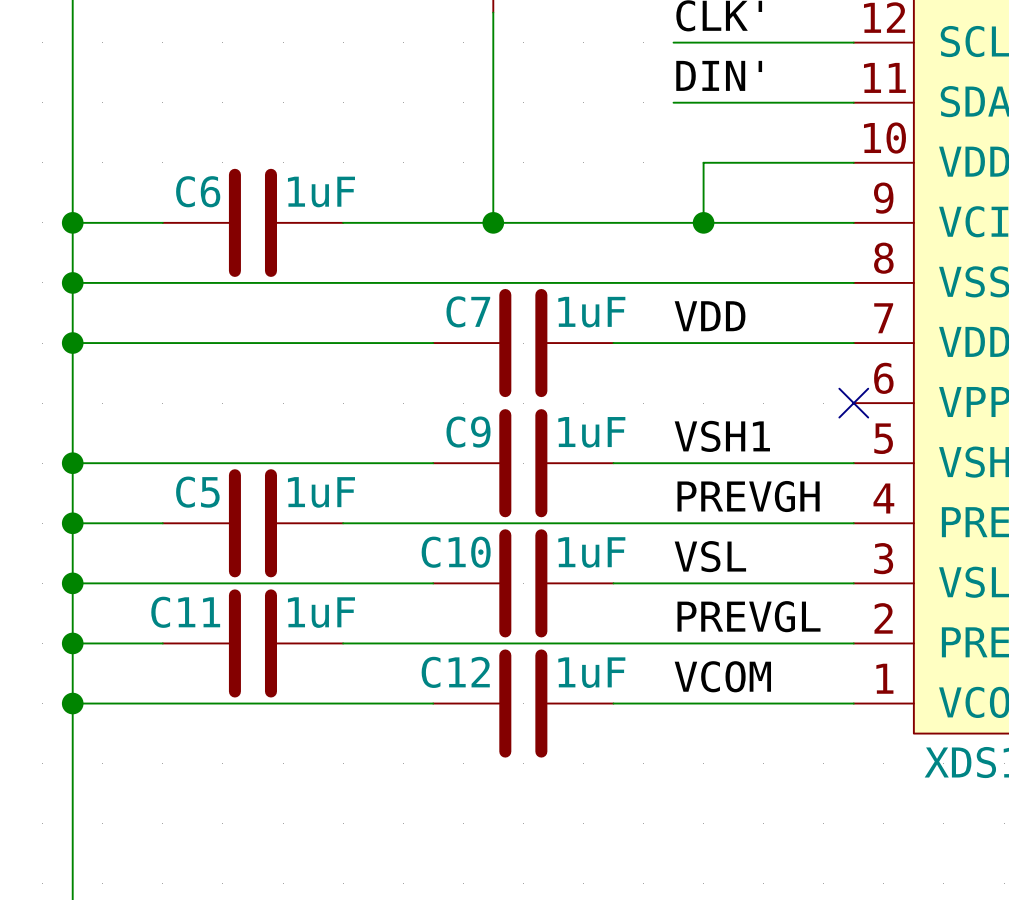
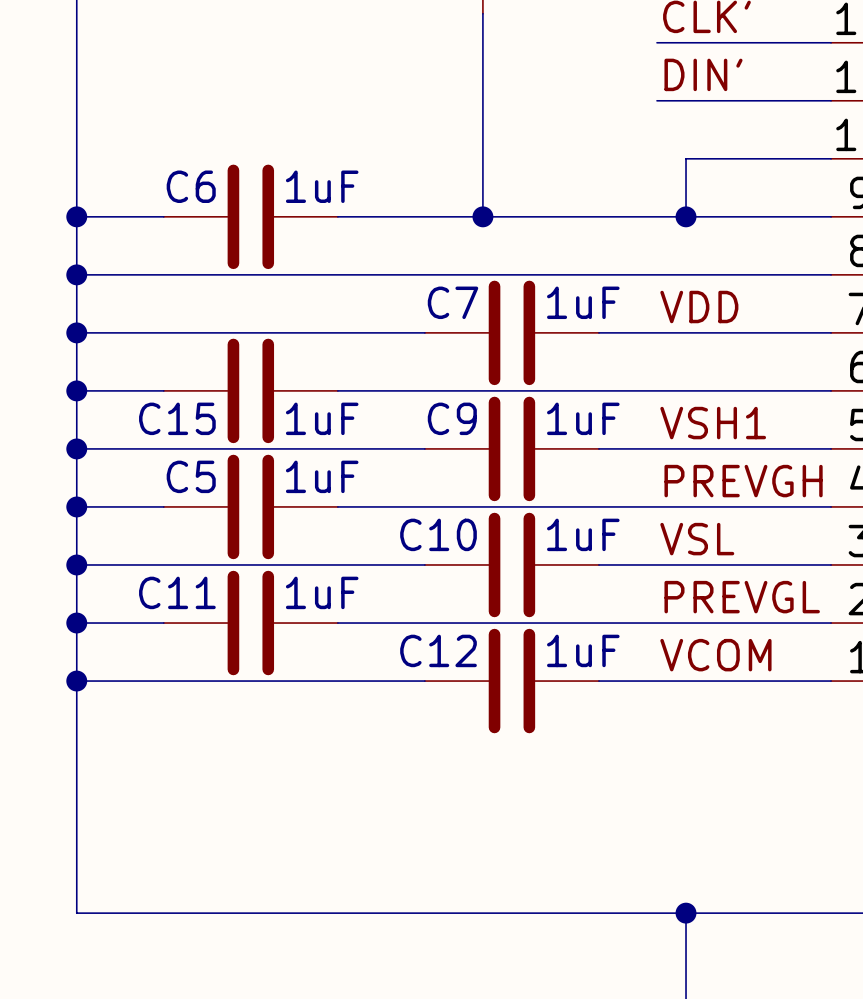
wire: none -> (76, 390) (163, 390)
junction: none -> (76, 390)
C15: none -> 1uF (250, 390)
wire: none -> (337, 390) (831, 390)
no-connect mark: (853, 403) -> none

